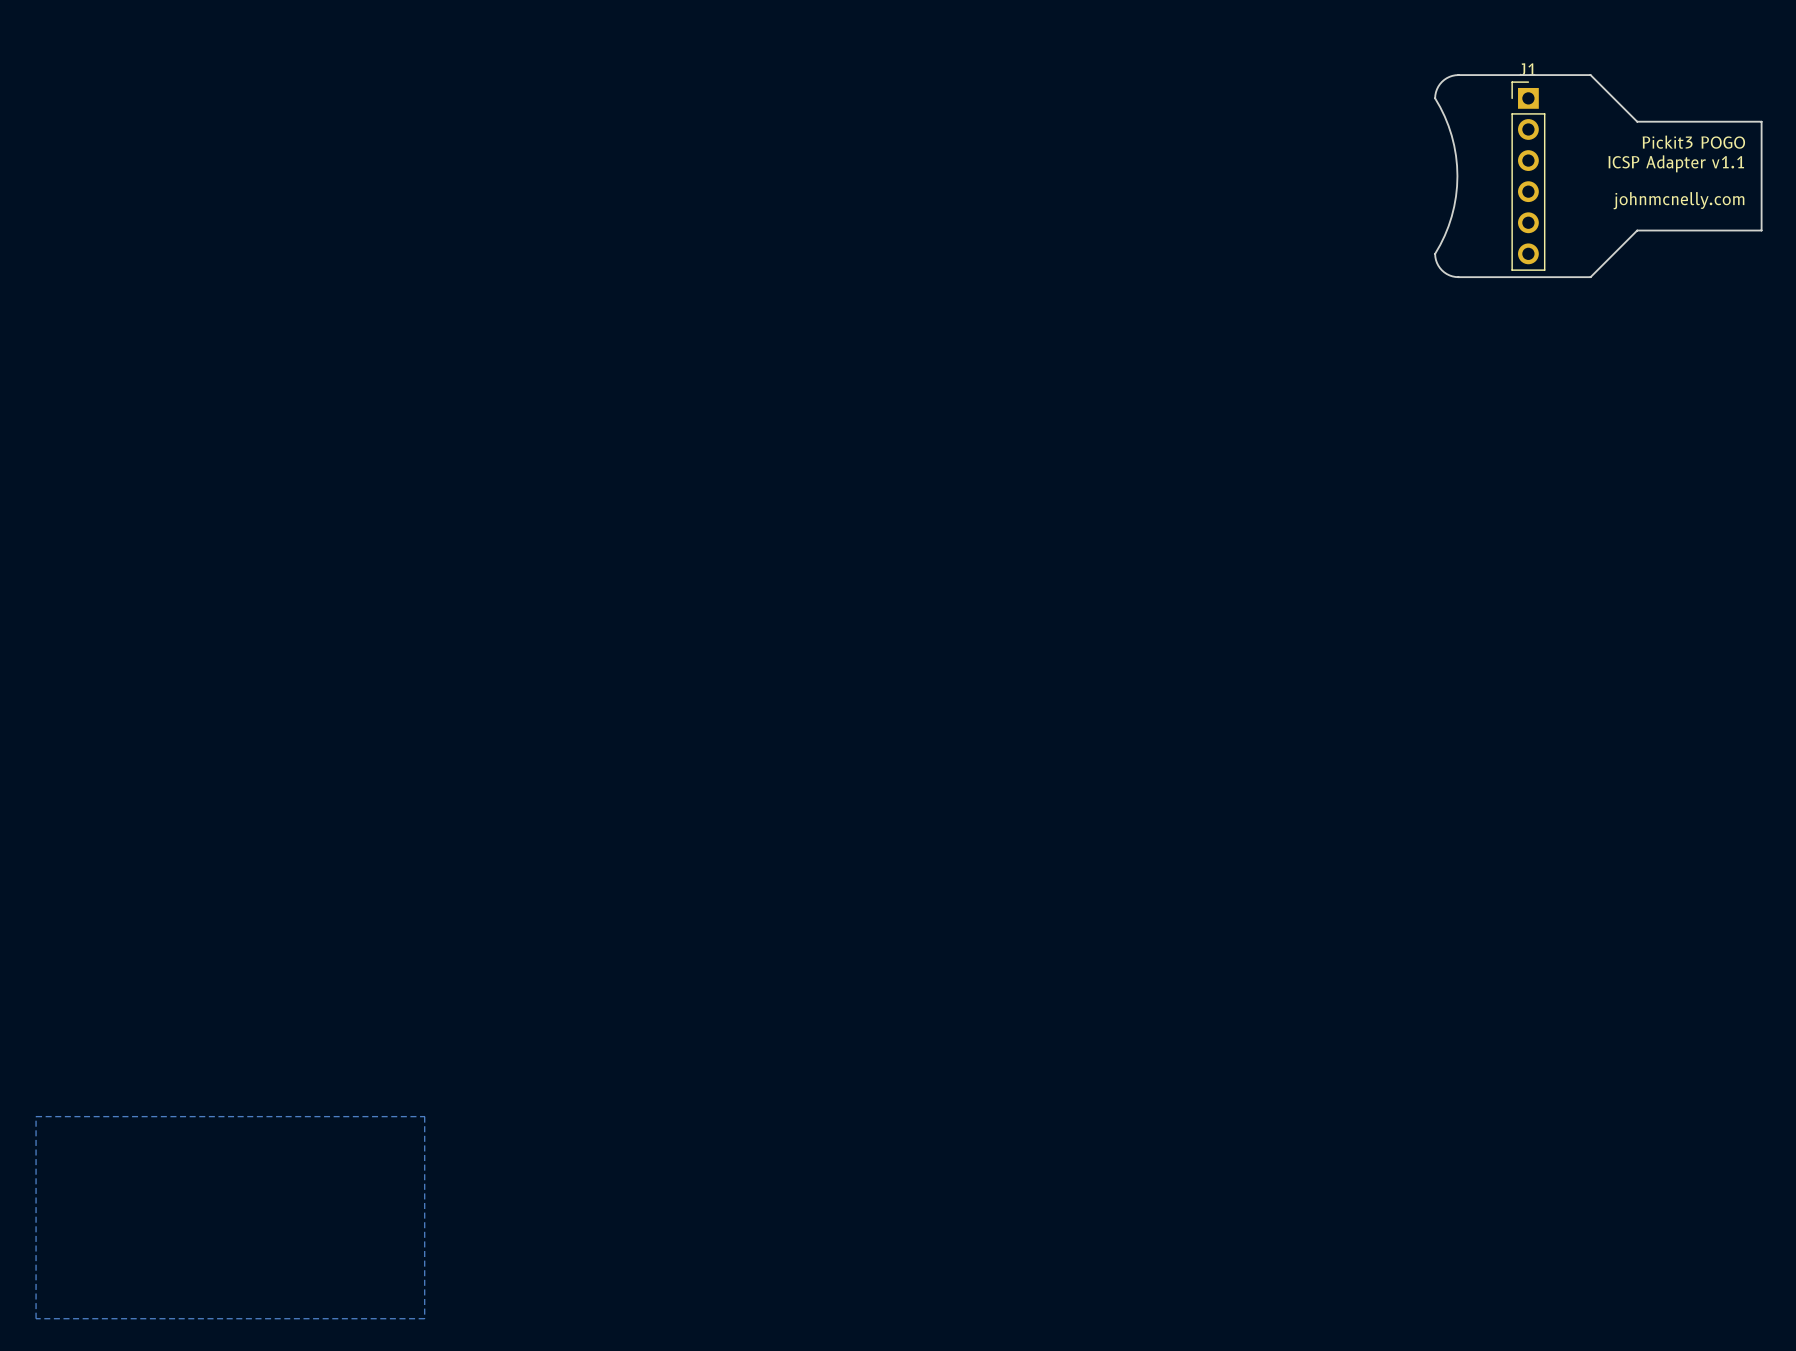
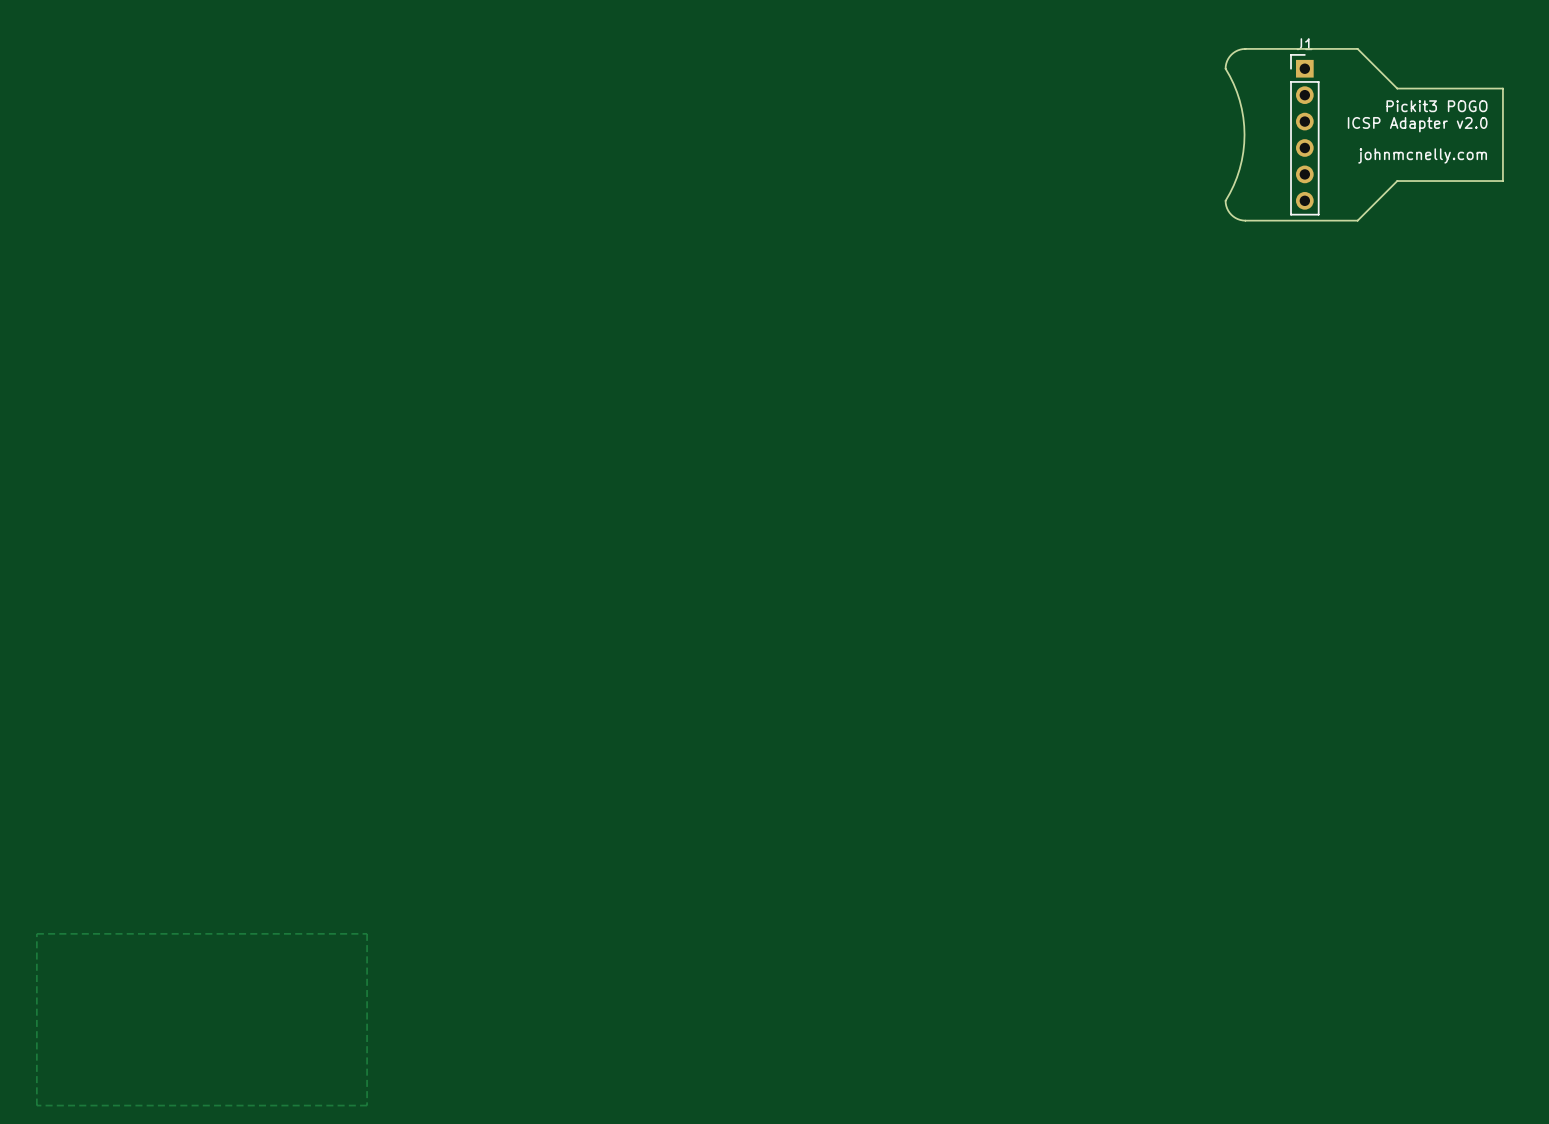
text: ICSP Adapter v1.1 (1676, 163) -> ICSP Adapter v2.0 (1417, 124)

